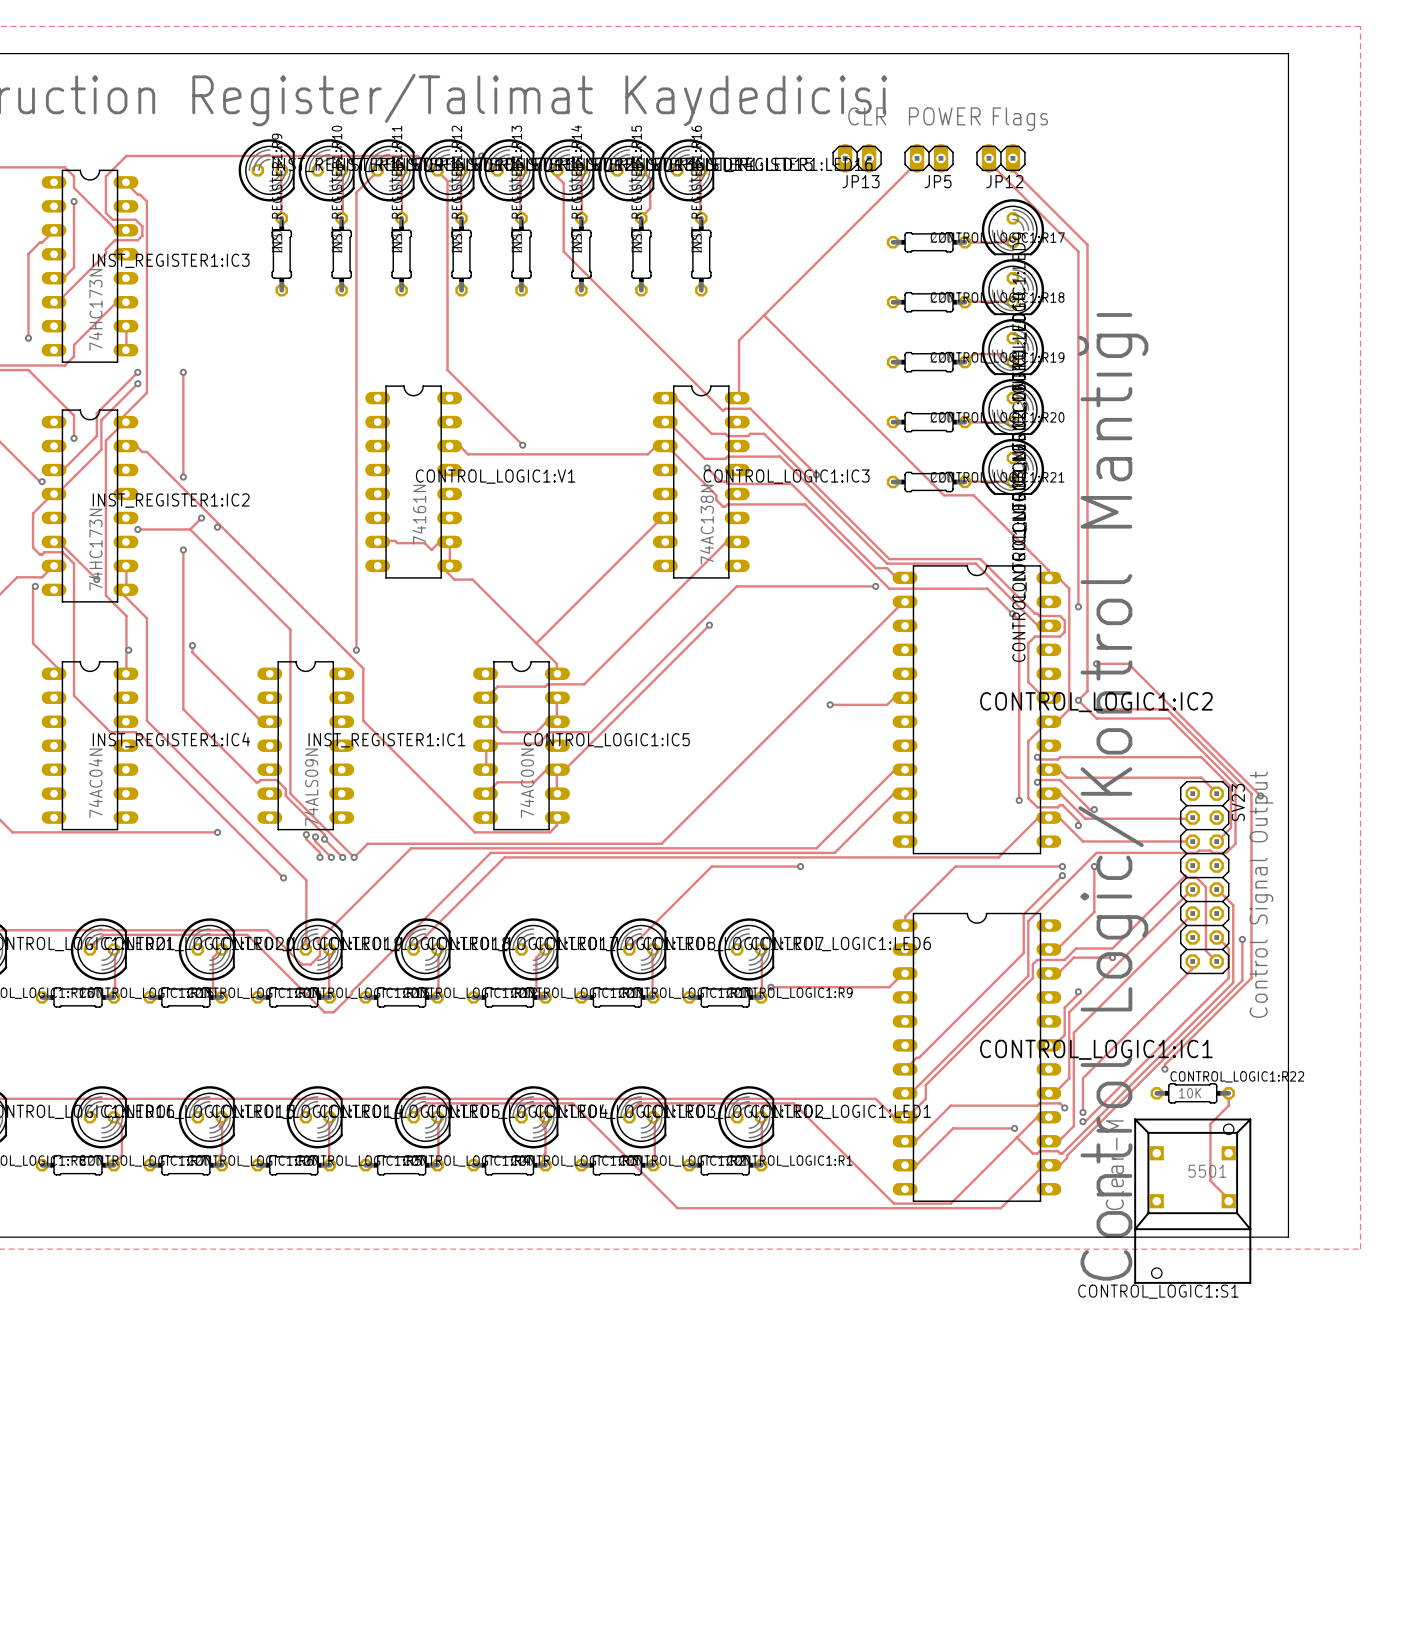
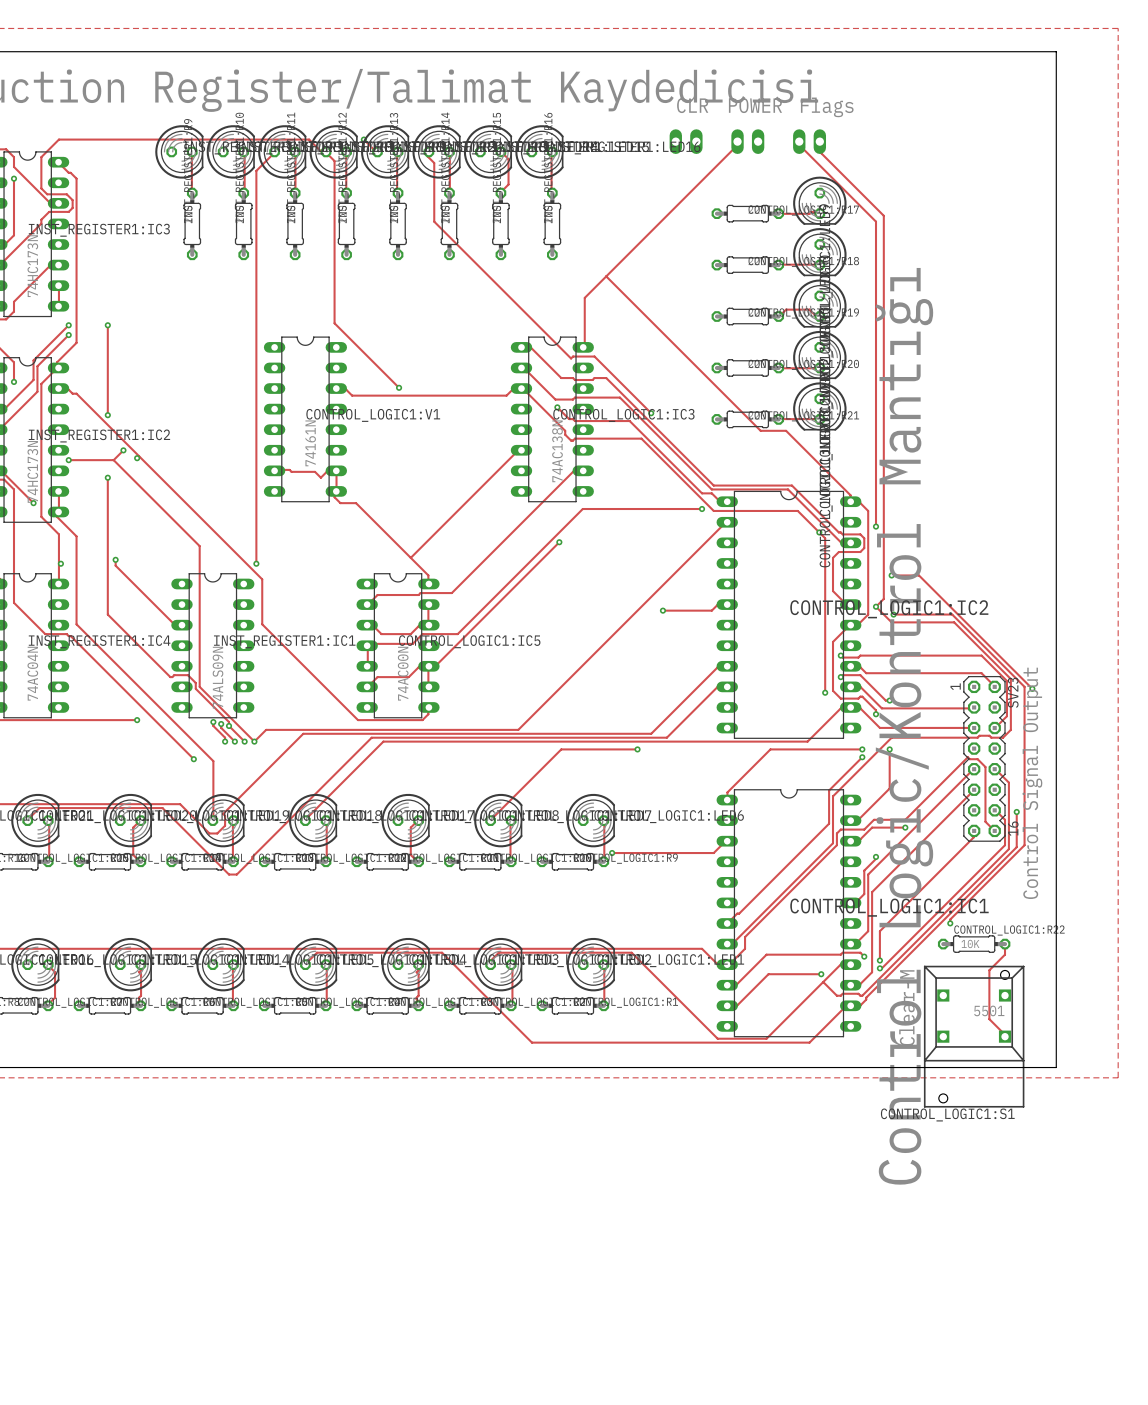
JP13 side: top (857, 158) -> bottom (686, 141)
JP5 side: top (929, 158) -> bottom (747, 141)
JP12 side: top (1000, 158) -> bottom (809, 141)
SV23 footprint: [1180, 780, 1230, 975] -> [963, 675, 1006, 842]

